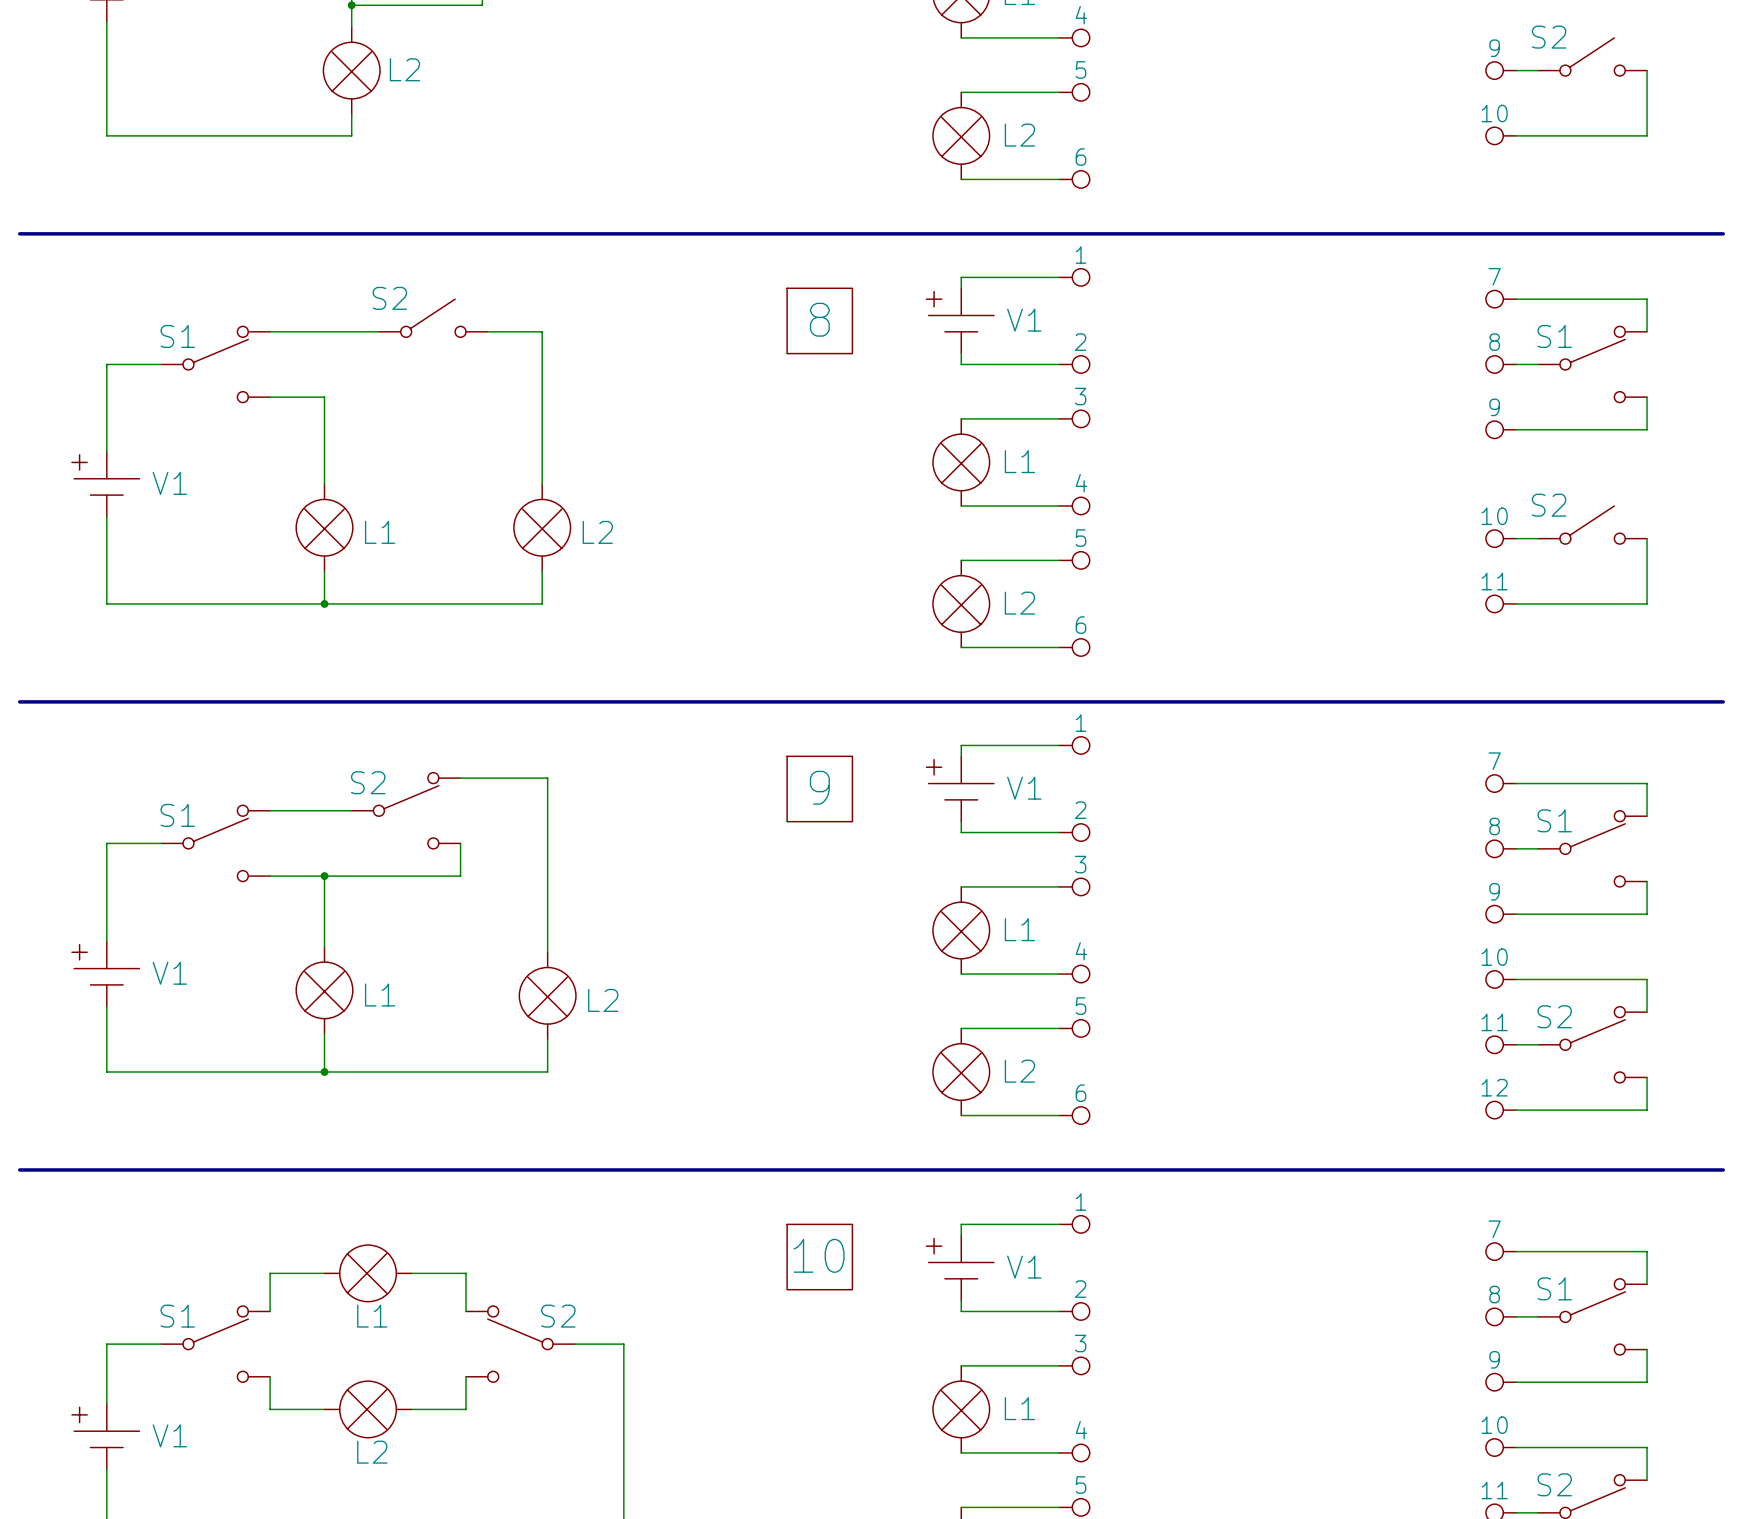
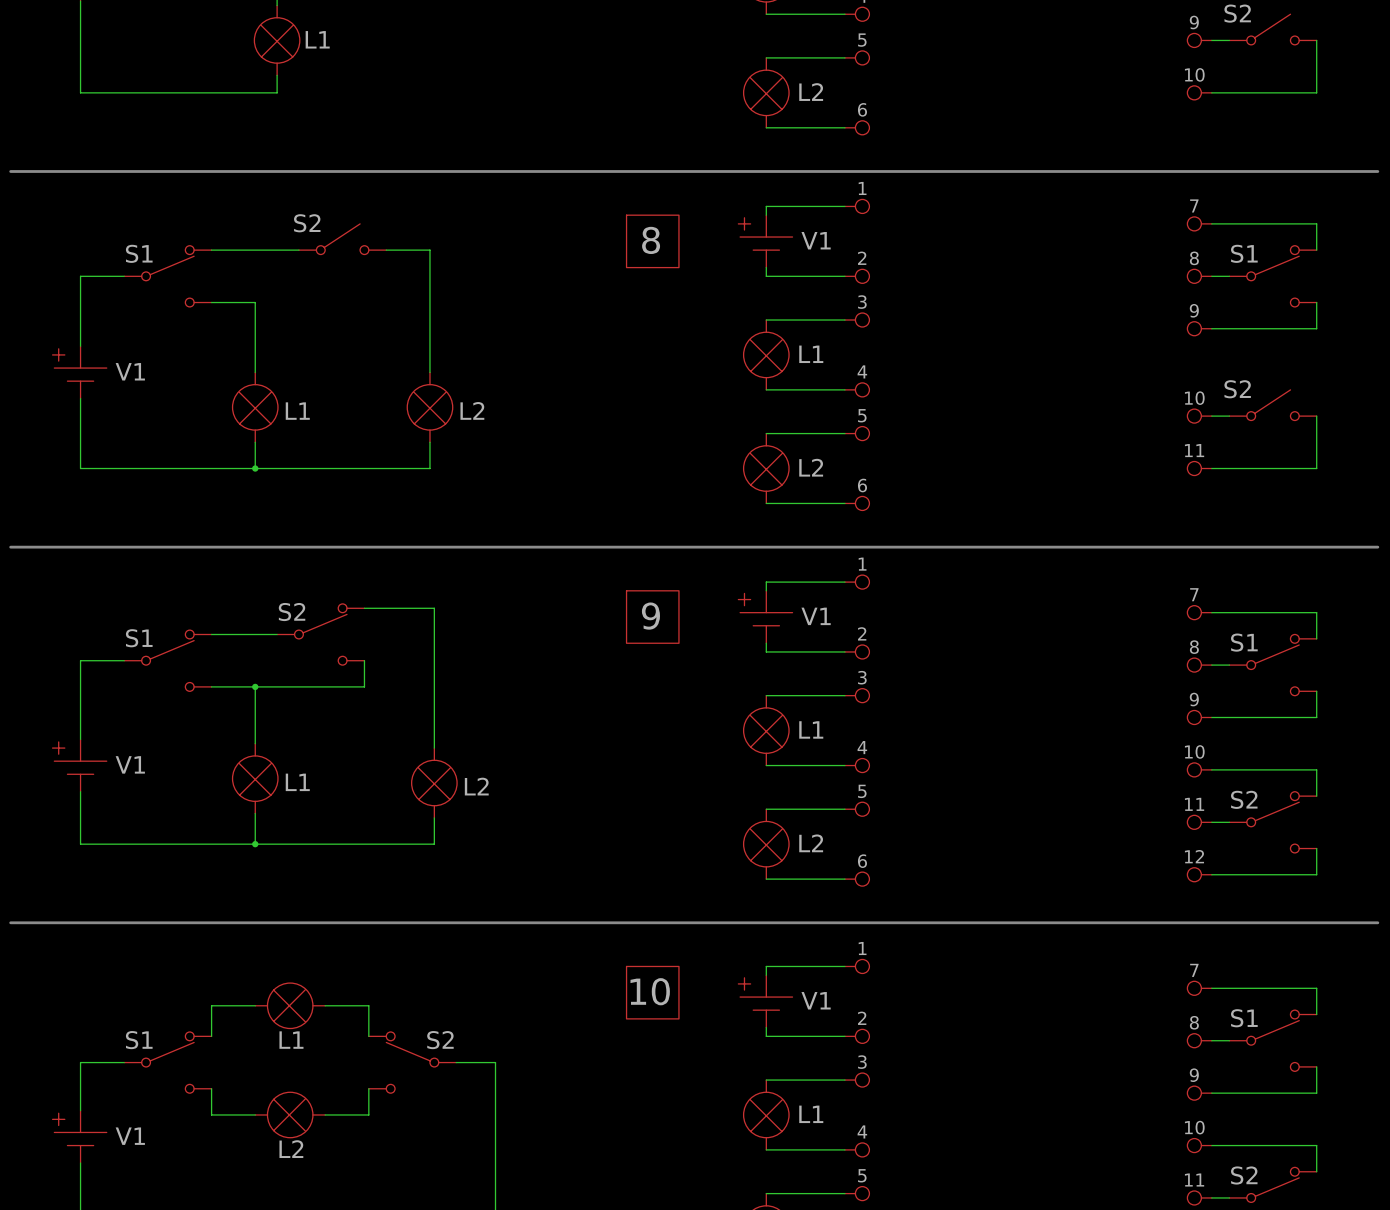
L2 name: L2 (404, 69) -> L1 (317, 39)

